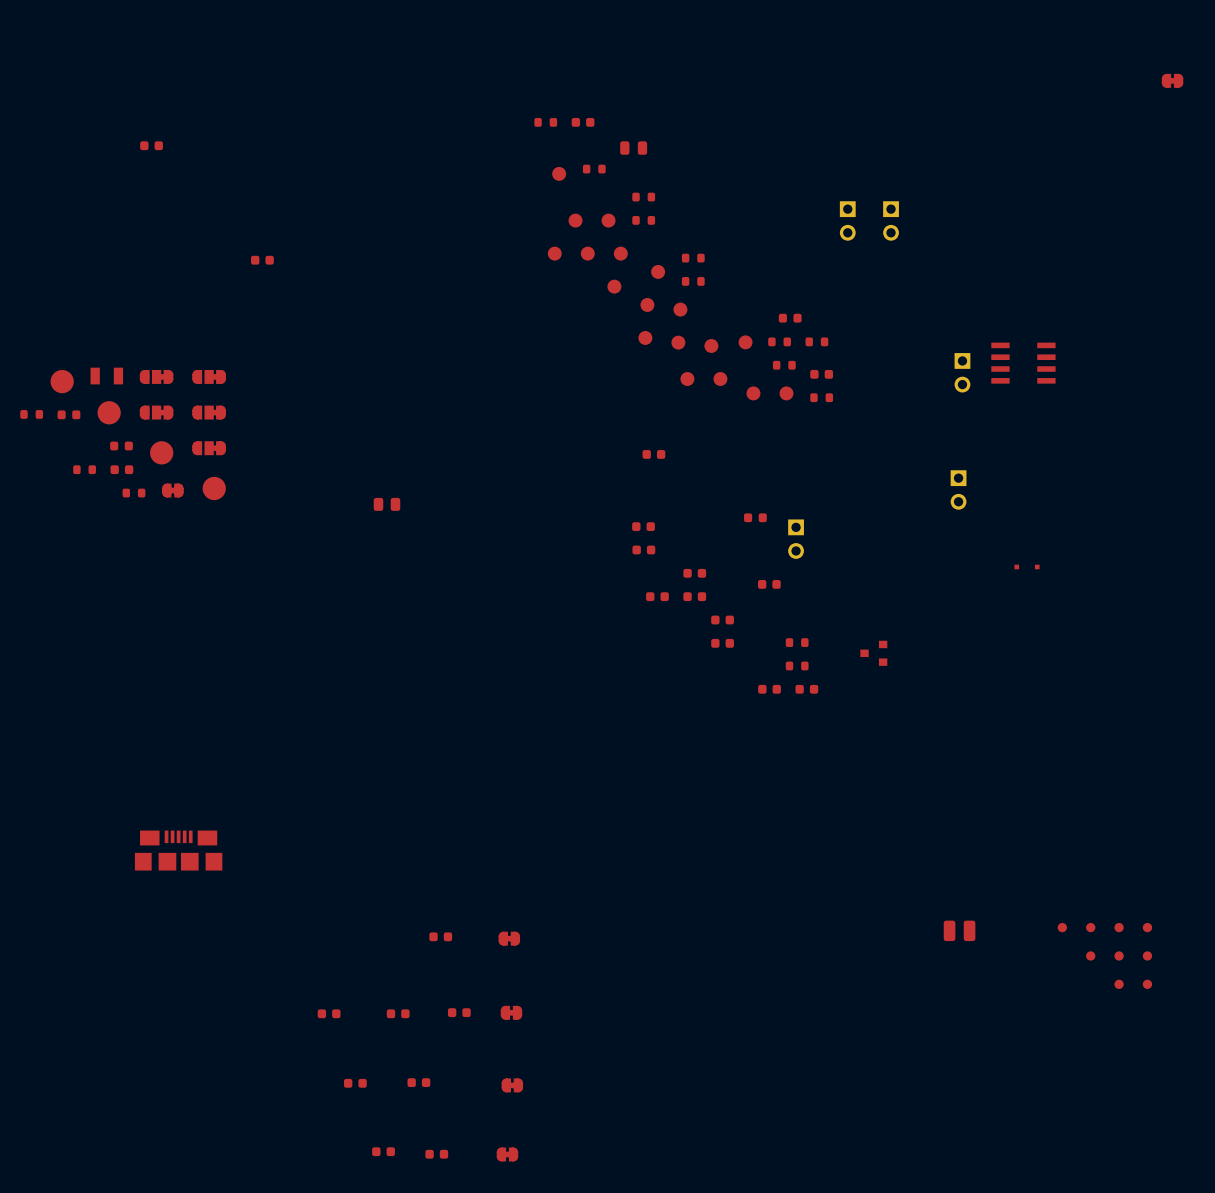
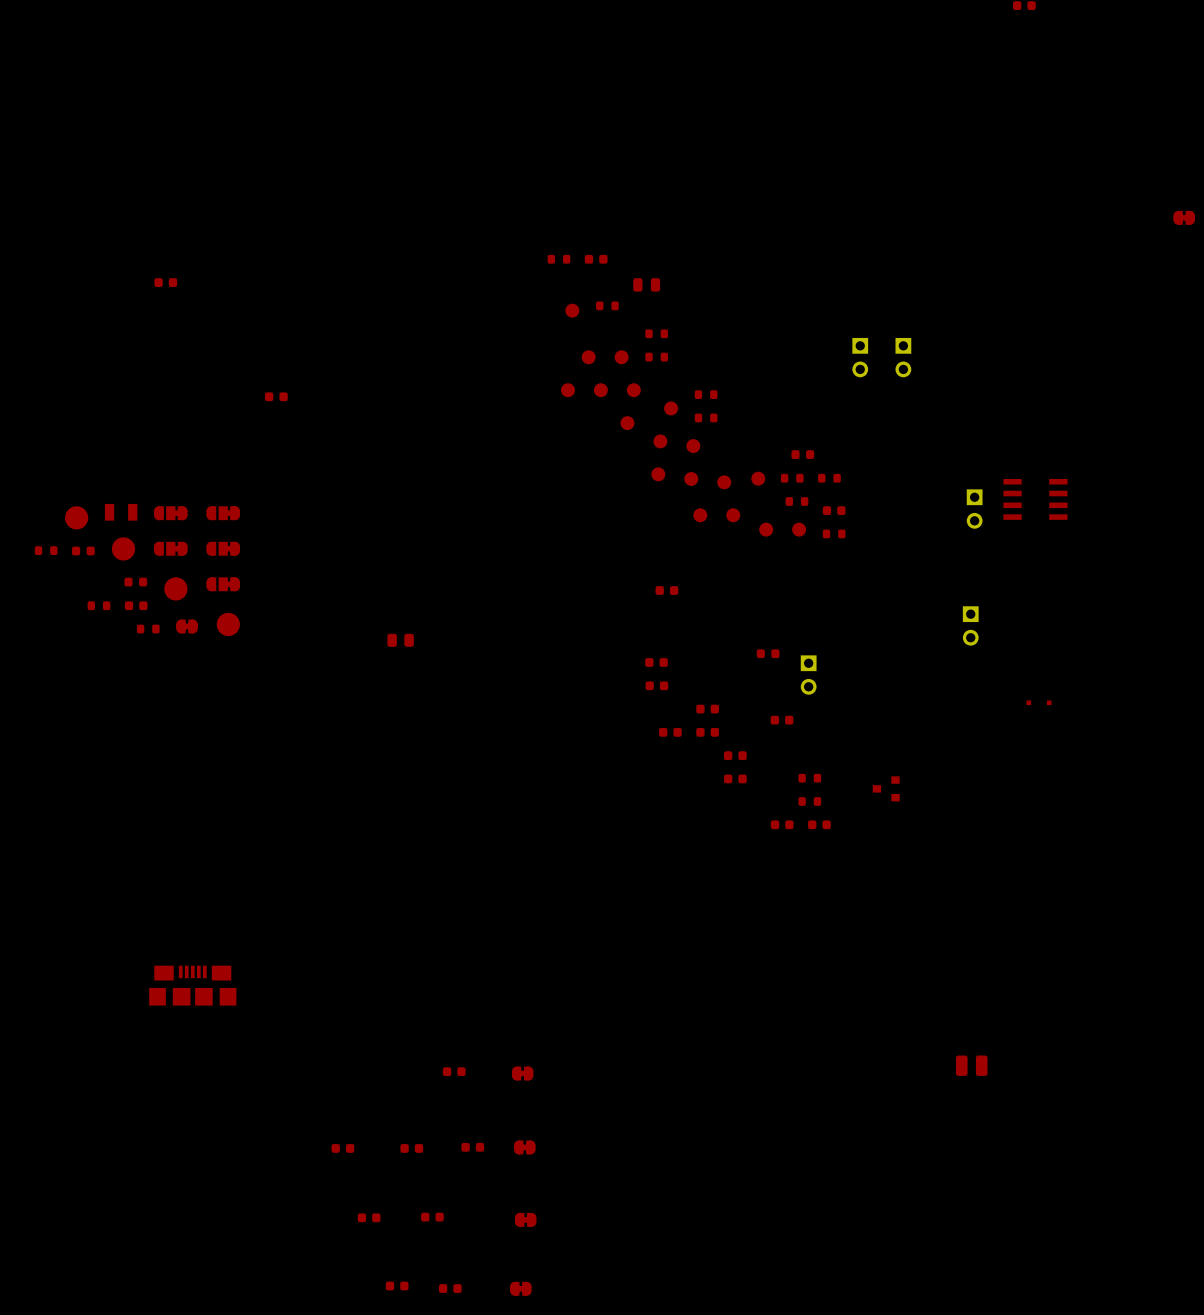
part: (1062, 927) -> none
part: (1090, 927) -> none
part: (1119, 927) -> none
part: (1147, 927) -> none
part: (1090, 955) -> none
part: (1119, 955) -> none
part: (1147, 955) -> none
part: (1119, 984) -> none
part: (1147, 984) -> none

